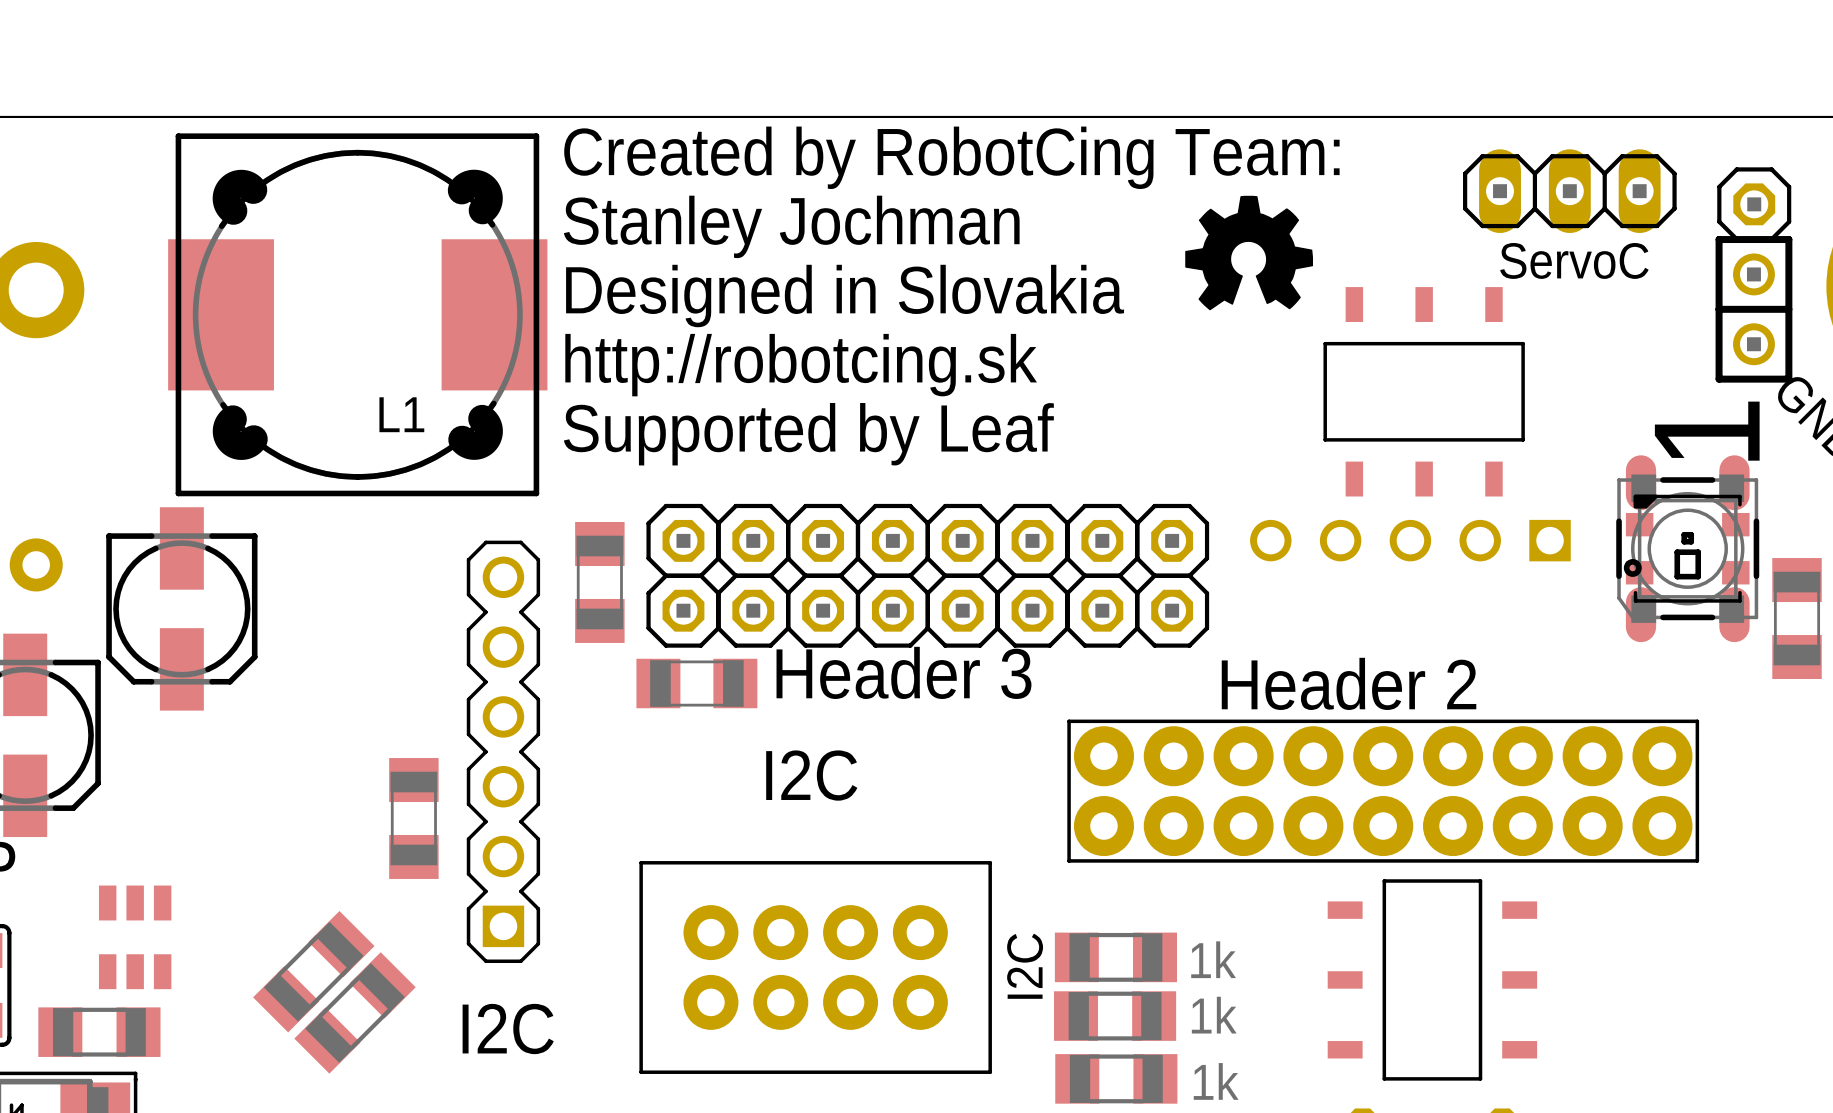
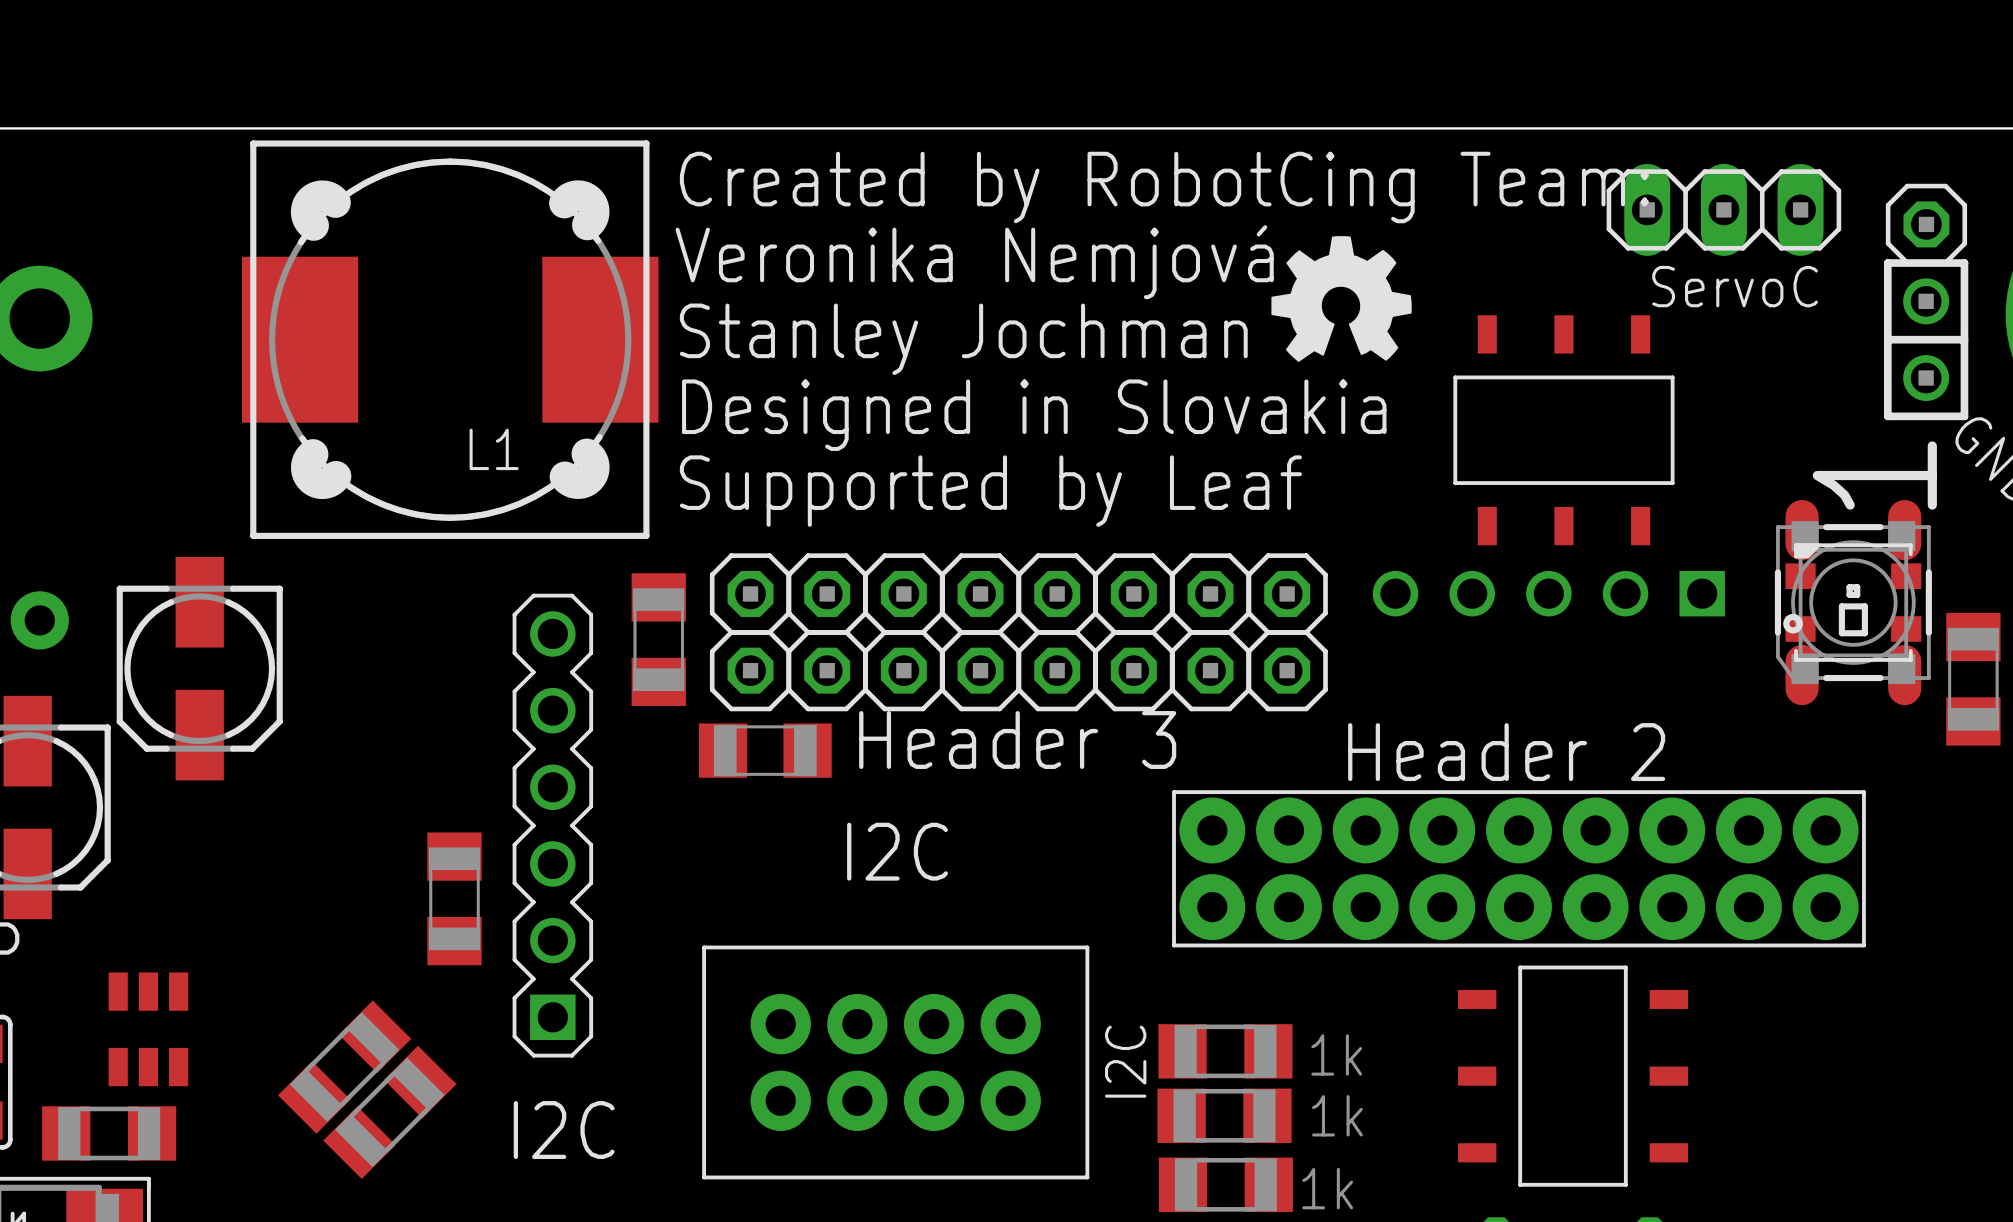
text position: Created by RobotCing Team: (951, 157) -> Created by RobotCing Team: (1164, 187)
text position: Stanley Jochman (791, 226) -> Stanley Jochman (963, 339)
text: none -> Veronika Nemjová (974, 262)
drawing position: (1249, 253) -> (1341, 299)
text position: Designed in Slovakia (845, 296) -> Designed in Slovakia (1034, 415)
L1 position: (357, 314) -> (450, 339)
text: http://robotcing.sk (801, 365) -> none
text position: Supported by Leaf (808, 434) -> Supported by Leaf (990, 491)

